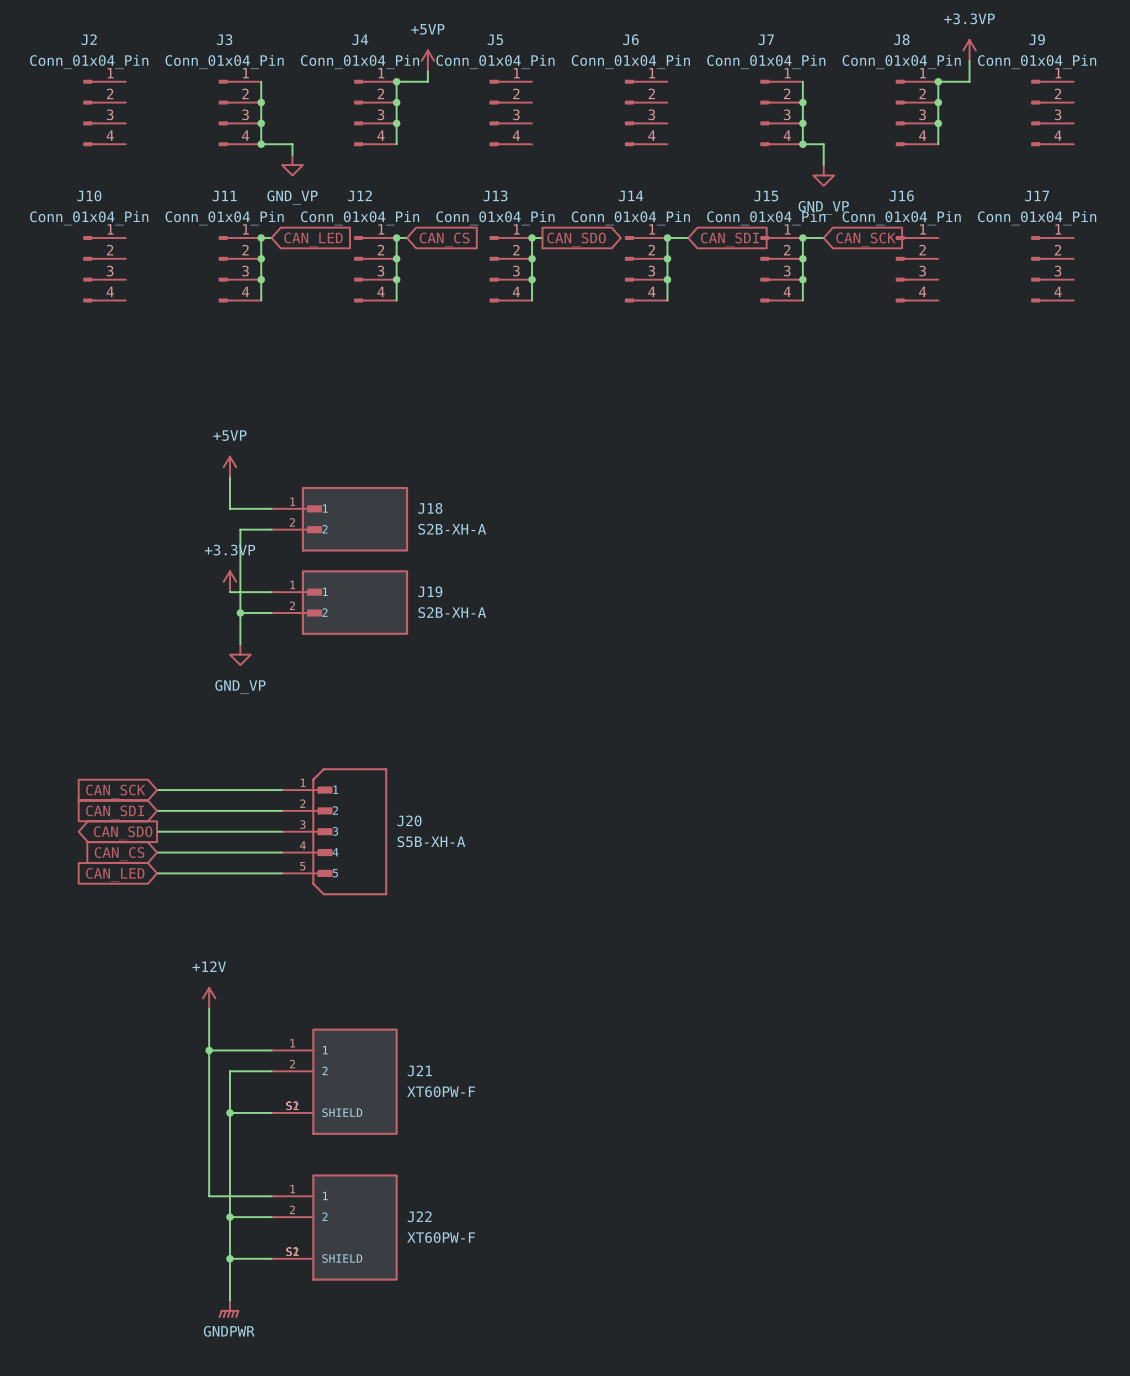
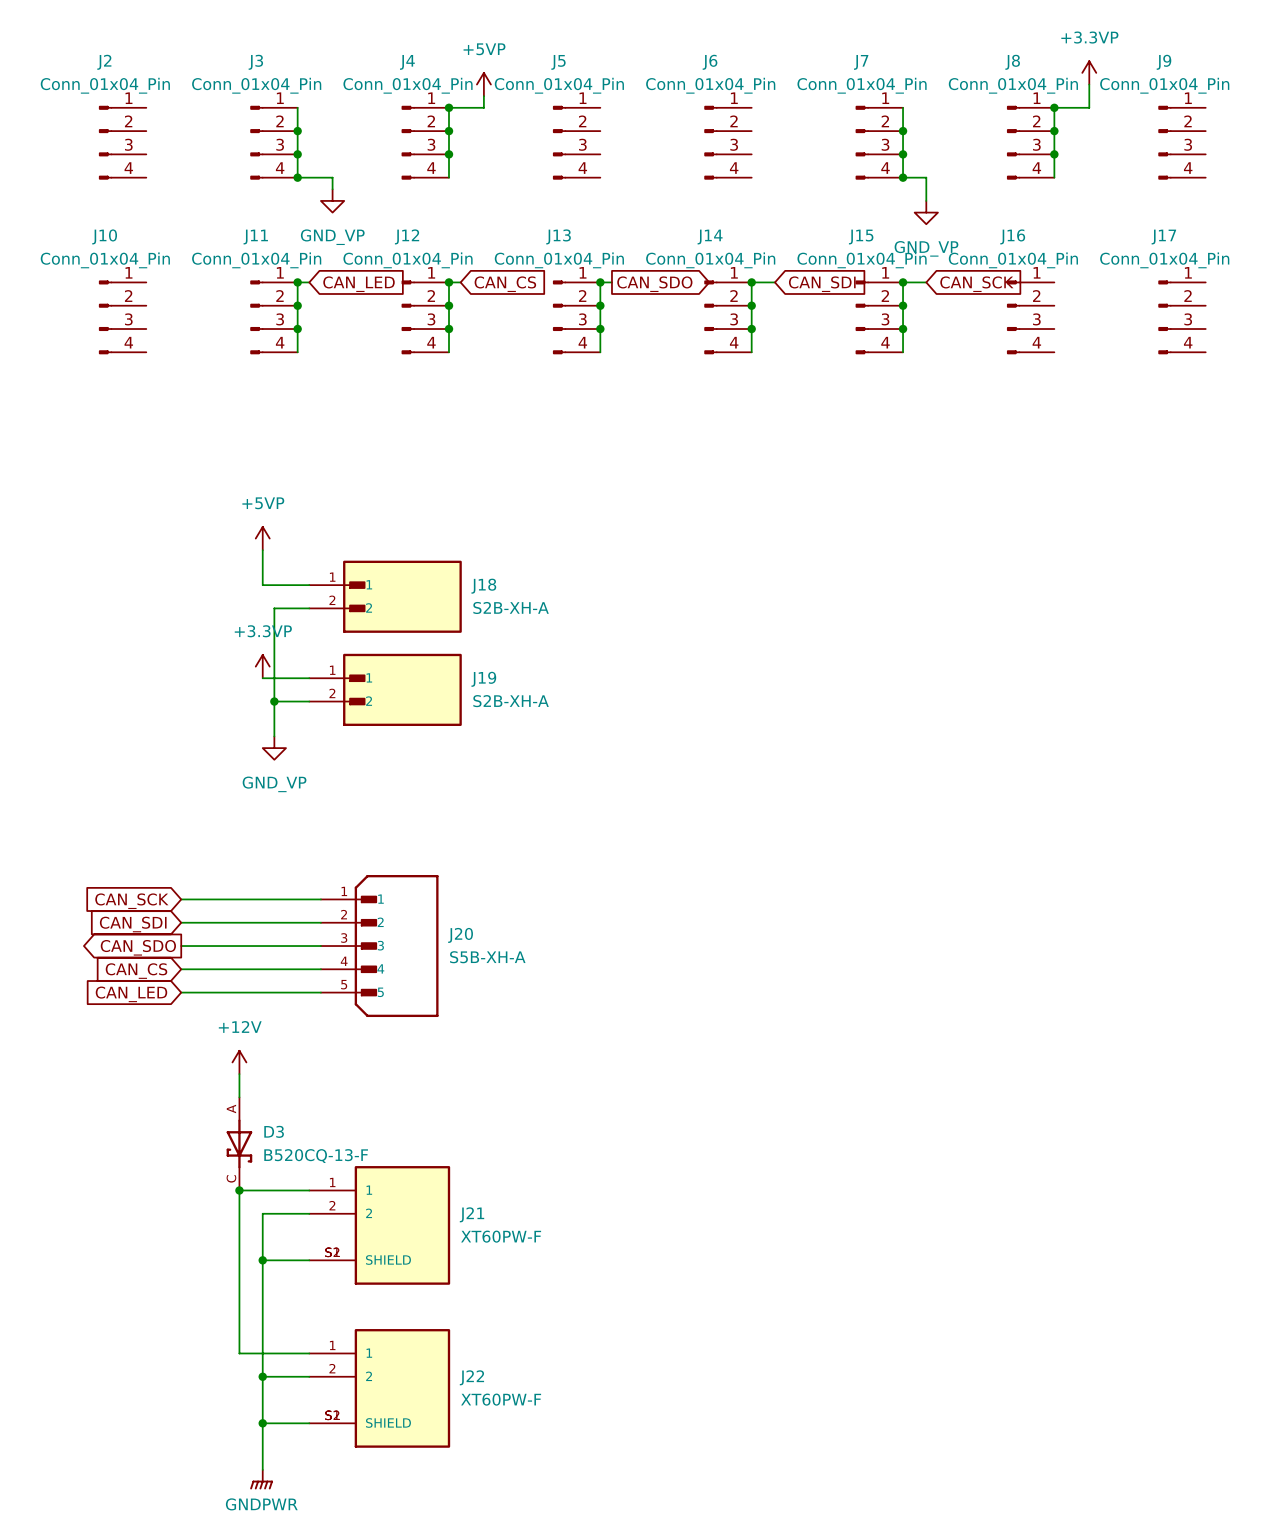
wire: none -> (239, 1074) (239, 1097)
power symbol position: +12V (209, 998) -> +12V (239, 1062)
D3: none -> B520CQ-13-F (239, 1143)

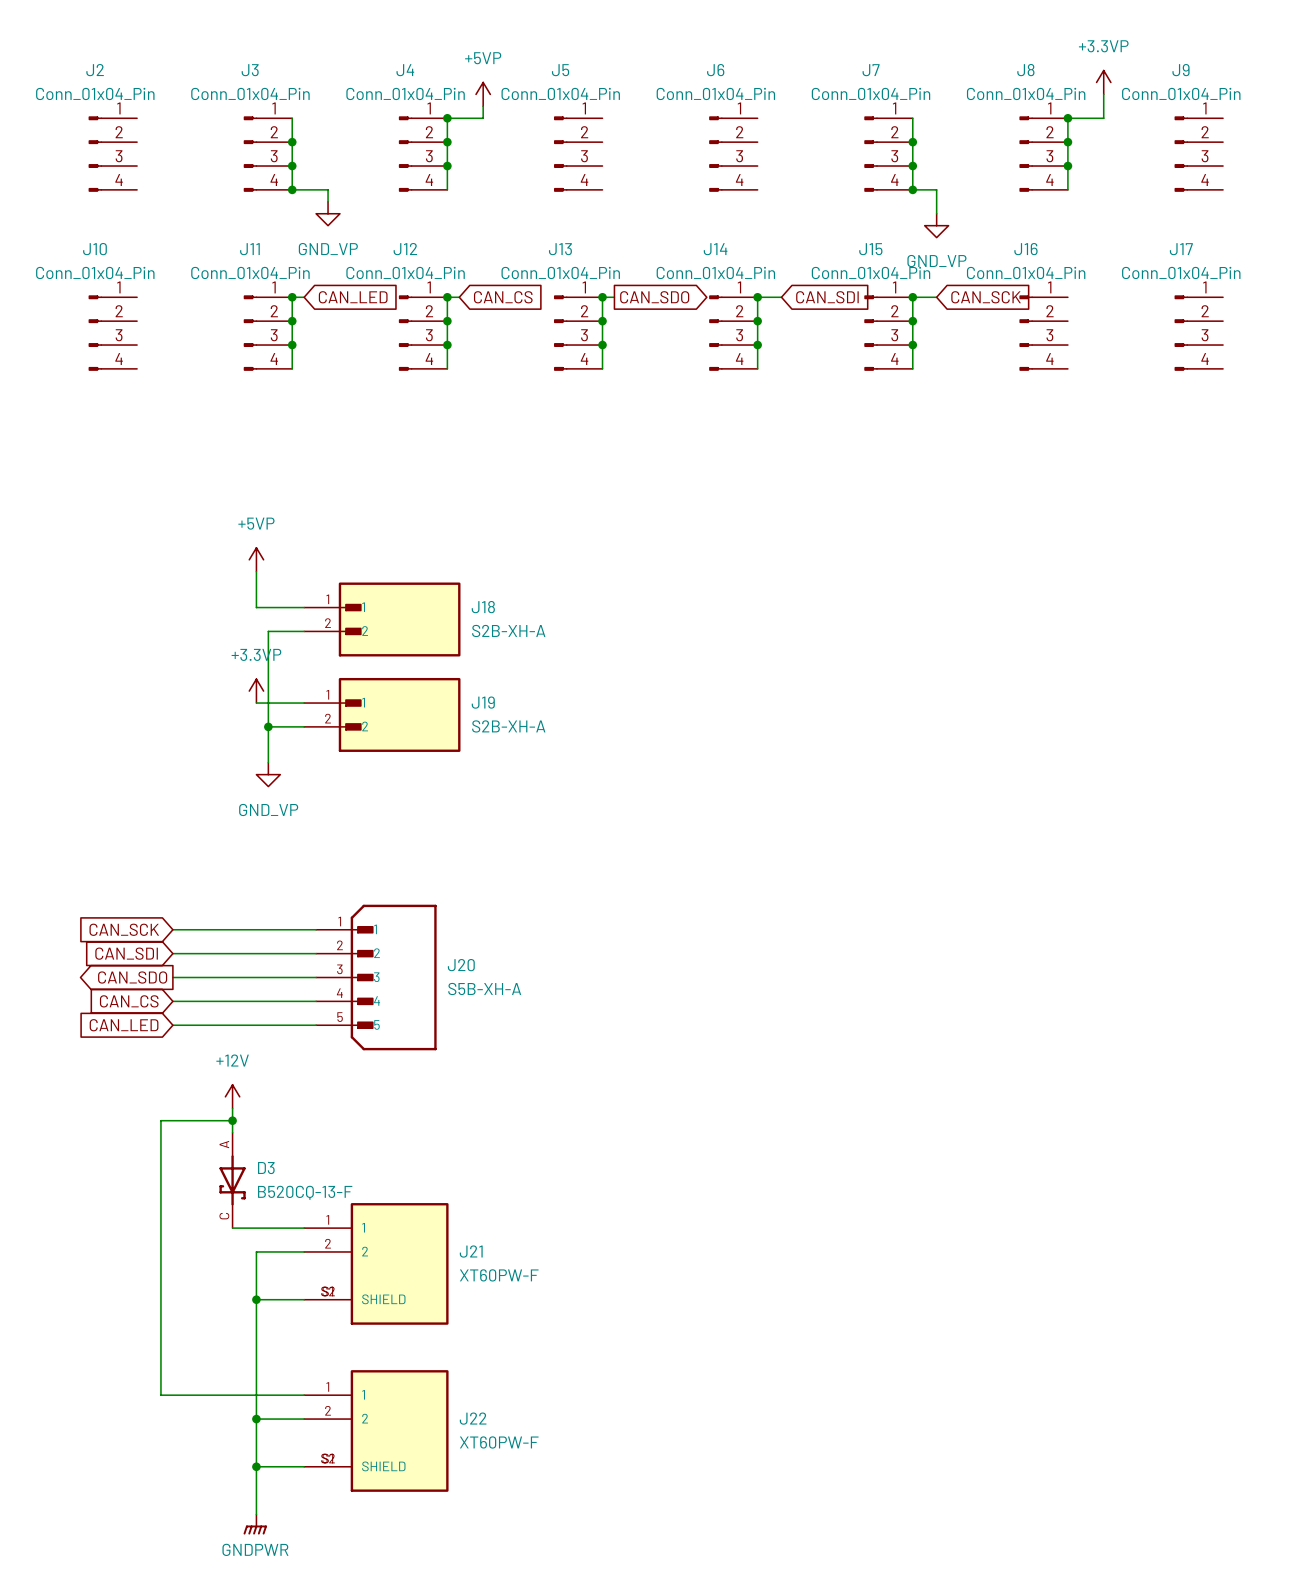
junction: none -> (232, 1120)
wire: (239, 1190) (239, 1353) -> (232, 1120) (160, 1120) (160, 1395) (232, 1395)
junction: (239, 1190) -> none

